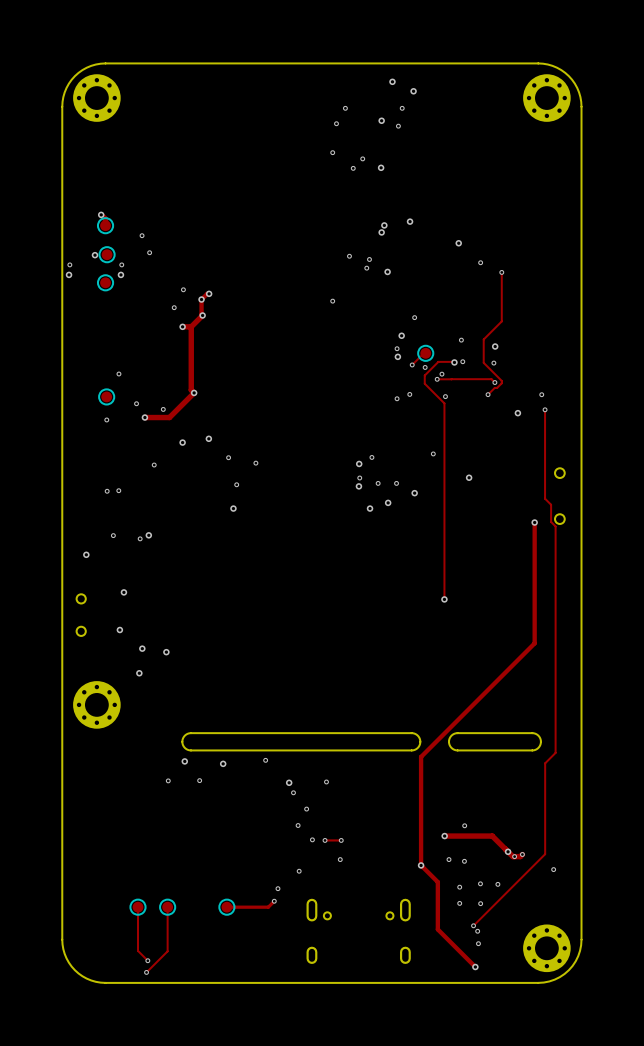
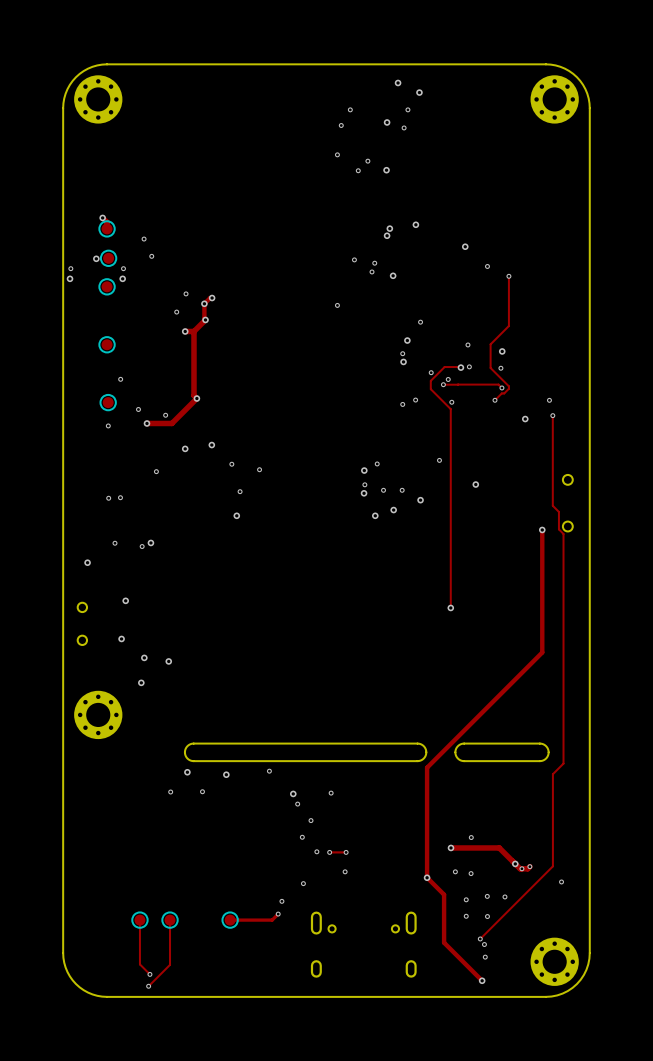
part: none -> (107, 344)
track: (425, 353) (412, 364) -> none
part: (425, 353) -> none
via: (412, 364) -> none

